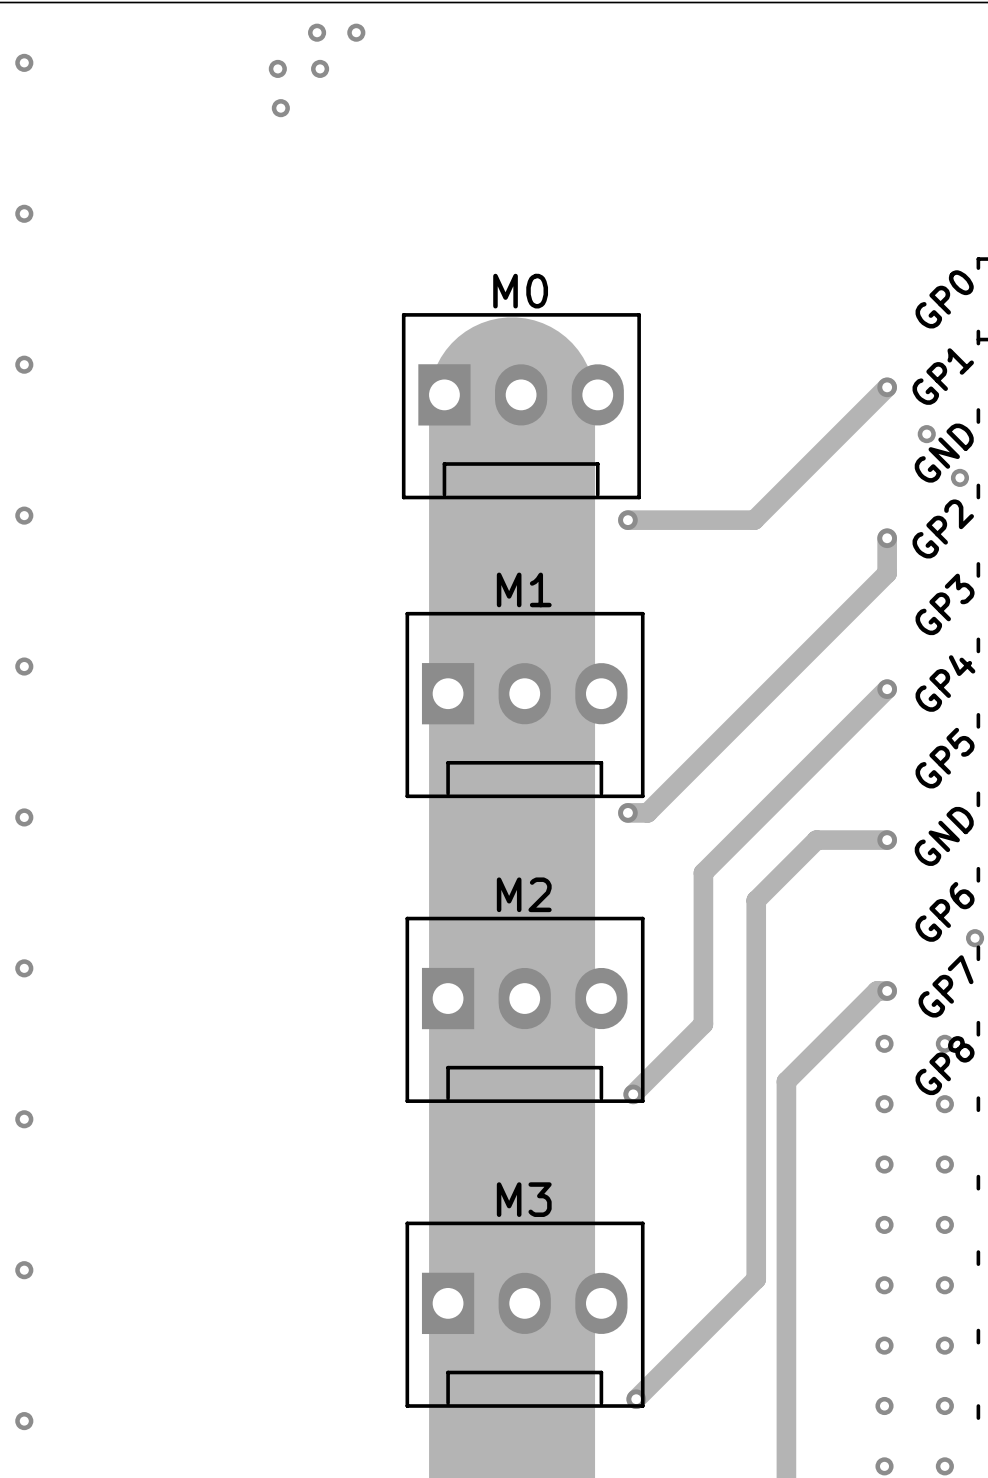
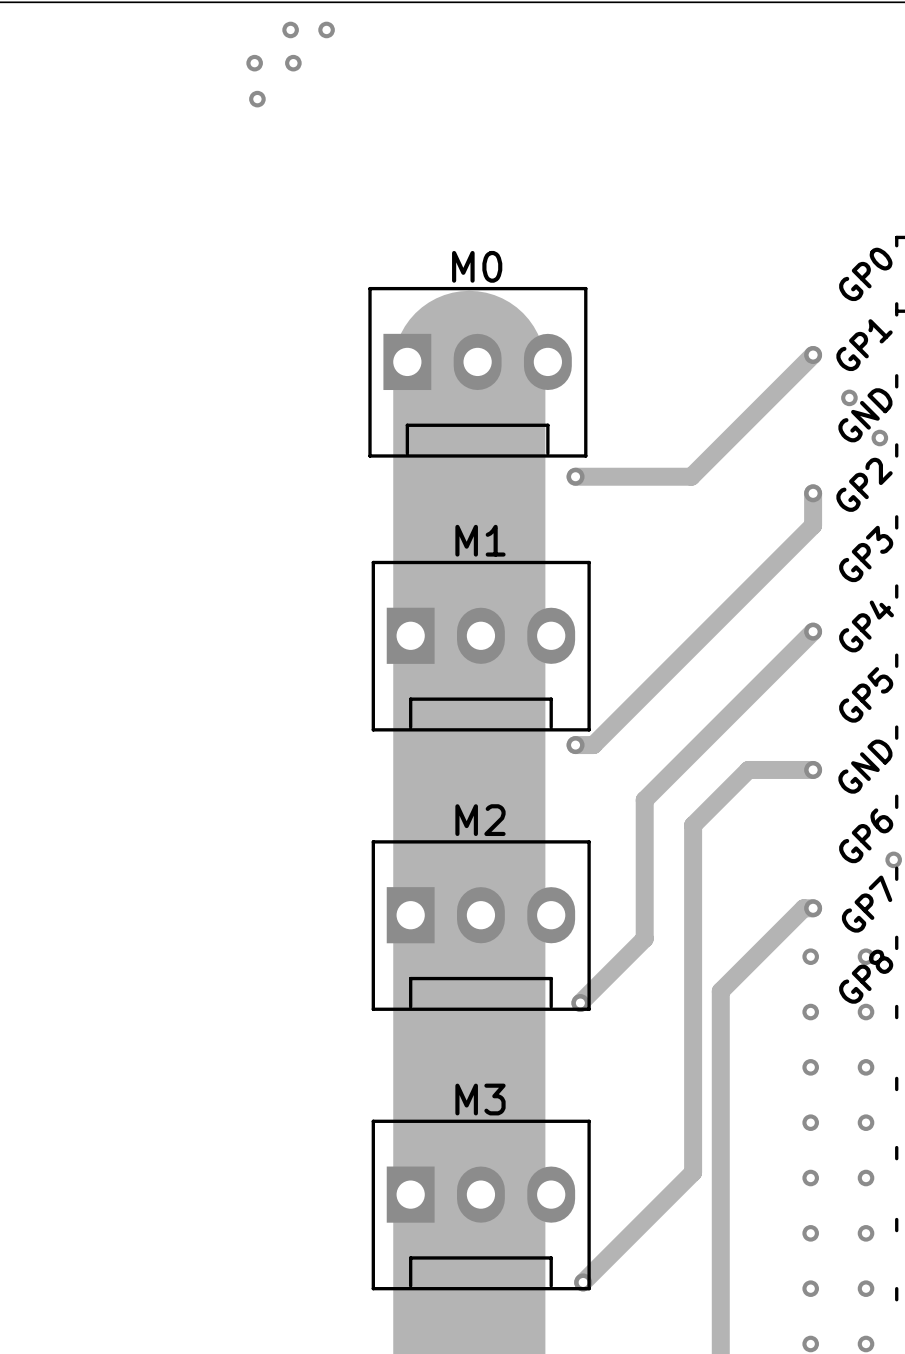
via: (24, 62) -> none
via: (24, 213) -> none
via: (24, 364) -> none
via: (24, 515) -> none
via: (24, 666) -> none
via: (24, 817) -> none
via: (24, 968) -> none
via: (24, 1119) -> none
via: (24, 1270) -> none
via: (24, 1421) -> none

